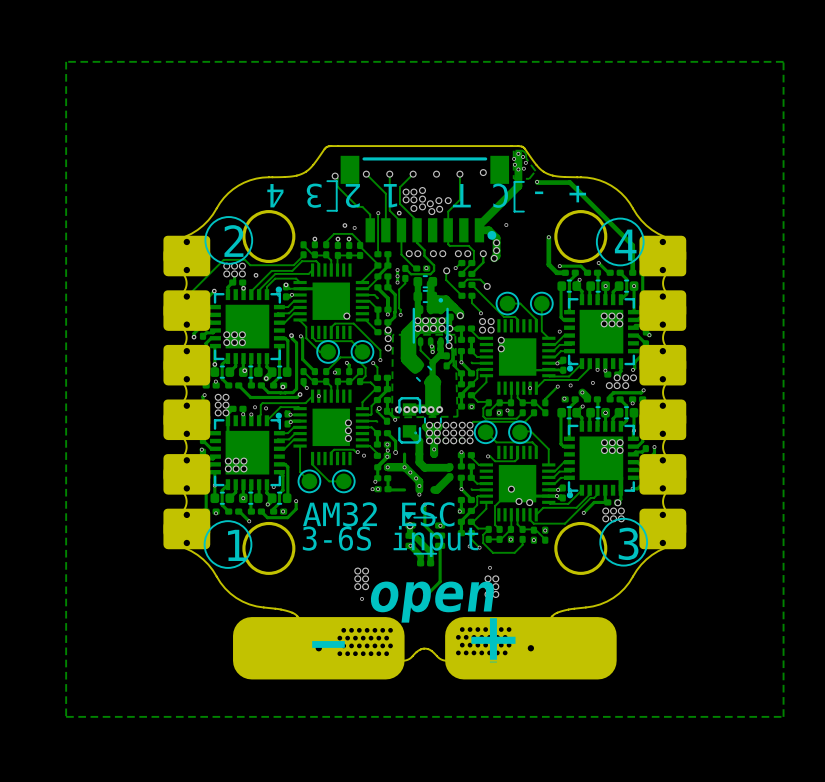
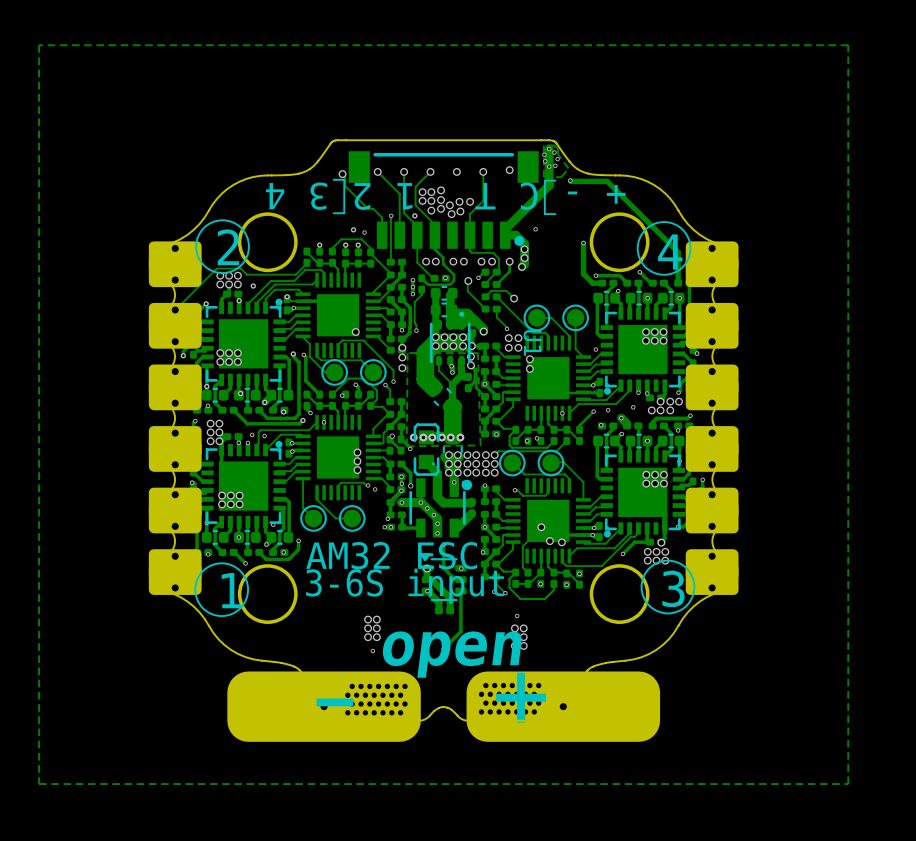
part: none -> (396, 311)
U1 name: none -> U1 (532, 342)
part: none -> (490, 384)
part: none -> (390, 445)
part: none -> (440, 507)
part: none -> (490, 527)

